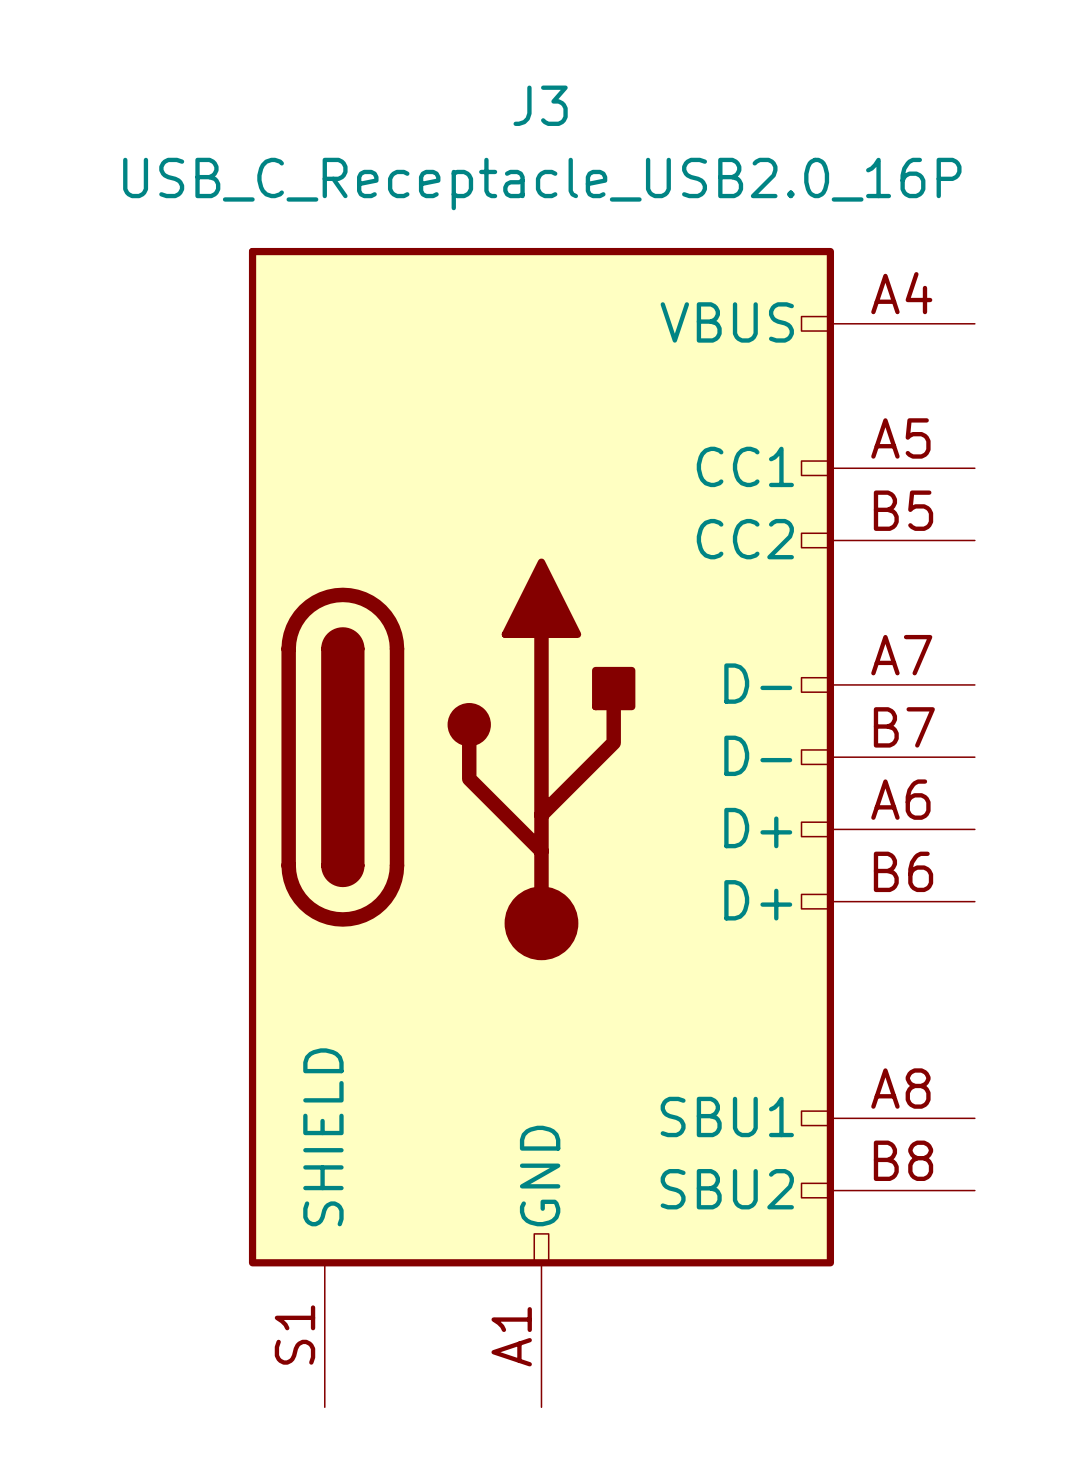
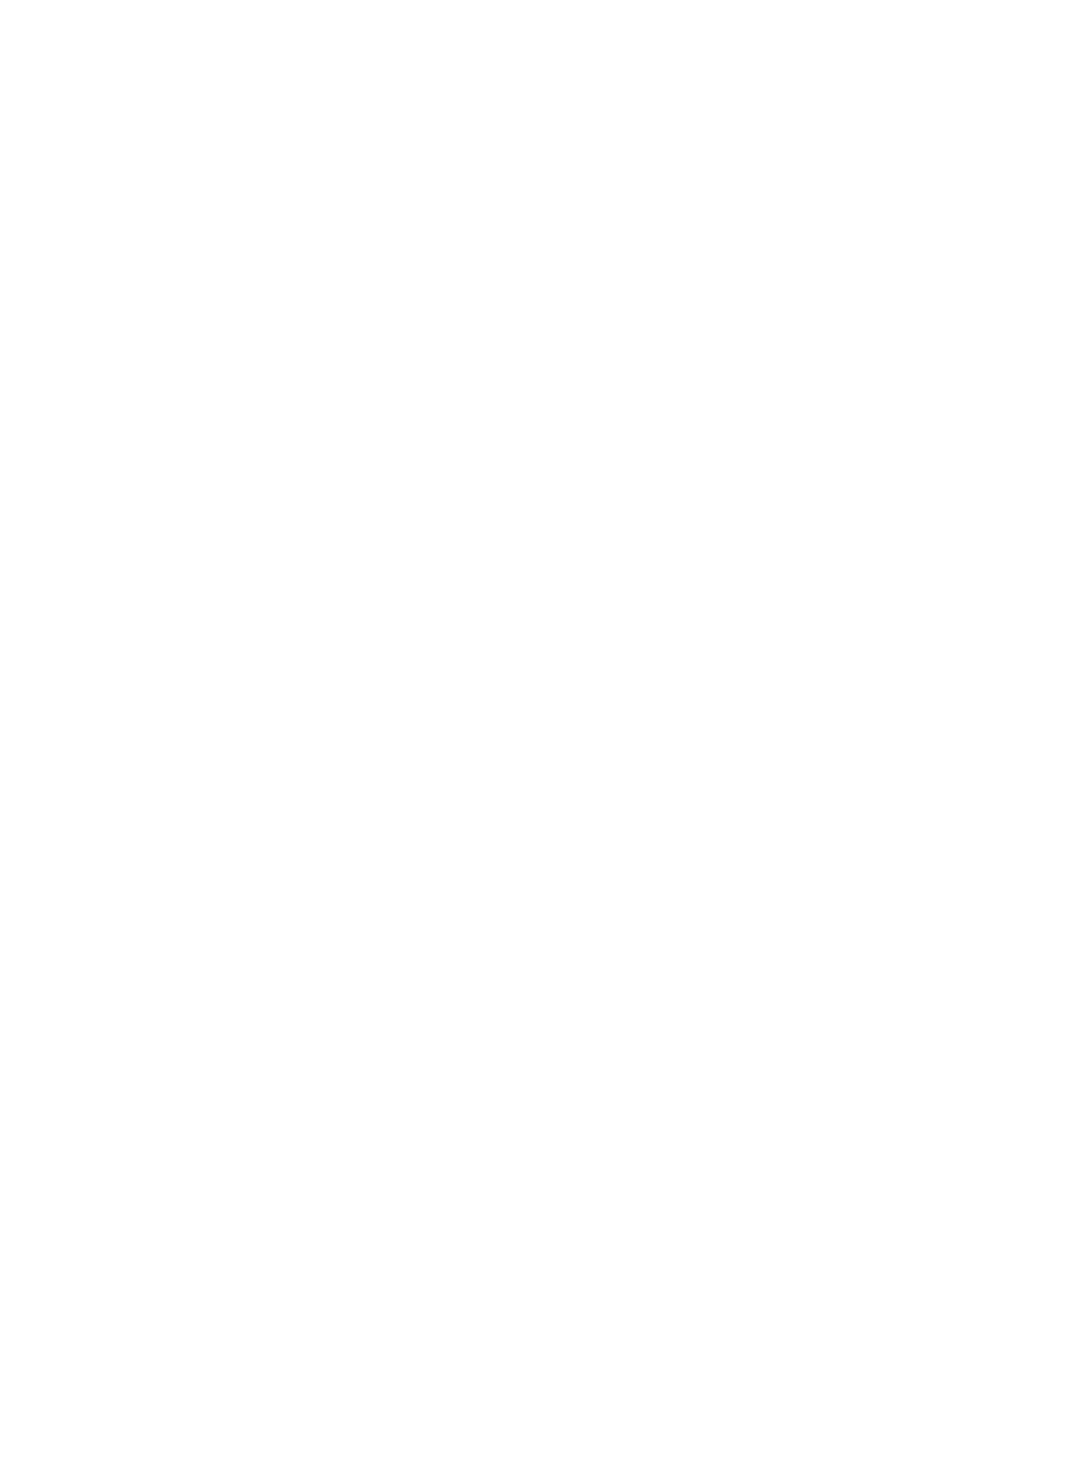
J3: USB_C_Receptacle_USB2.0_16P (611, 827) -> none

